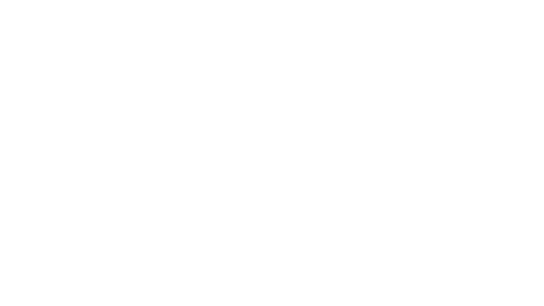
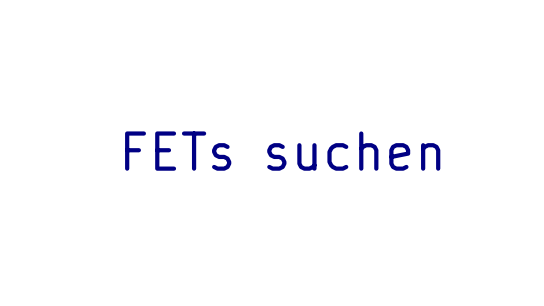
text: none -> FETs suchen (282, 151)

